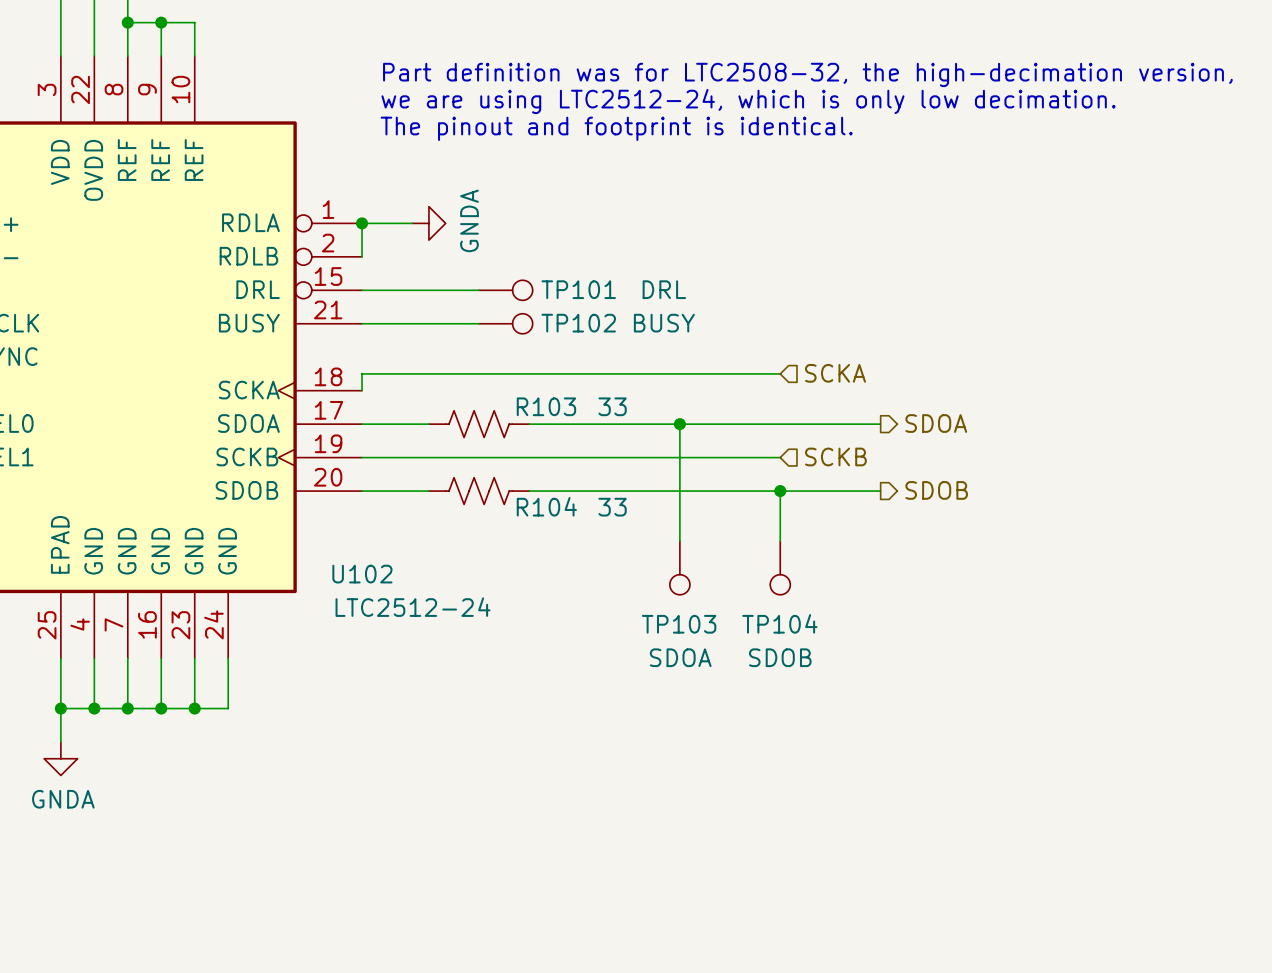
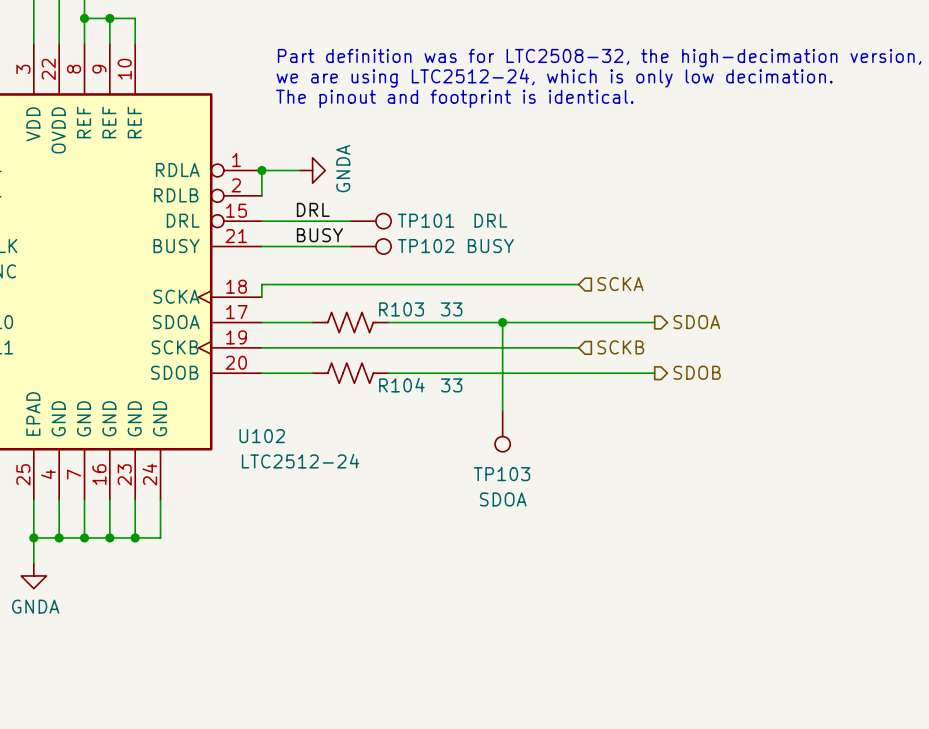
label: none -> DRL (313, 209)
label: none -> BUSY (319, 235)
wire: (780, 491) (780, 541) -> none
junction: (780, 491) -> none
TP104: SDOB (780, 568) -> none

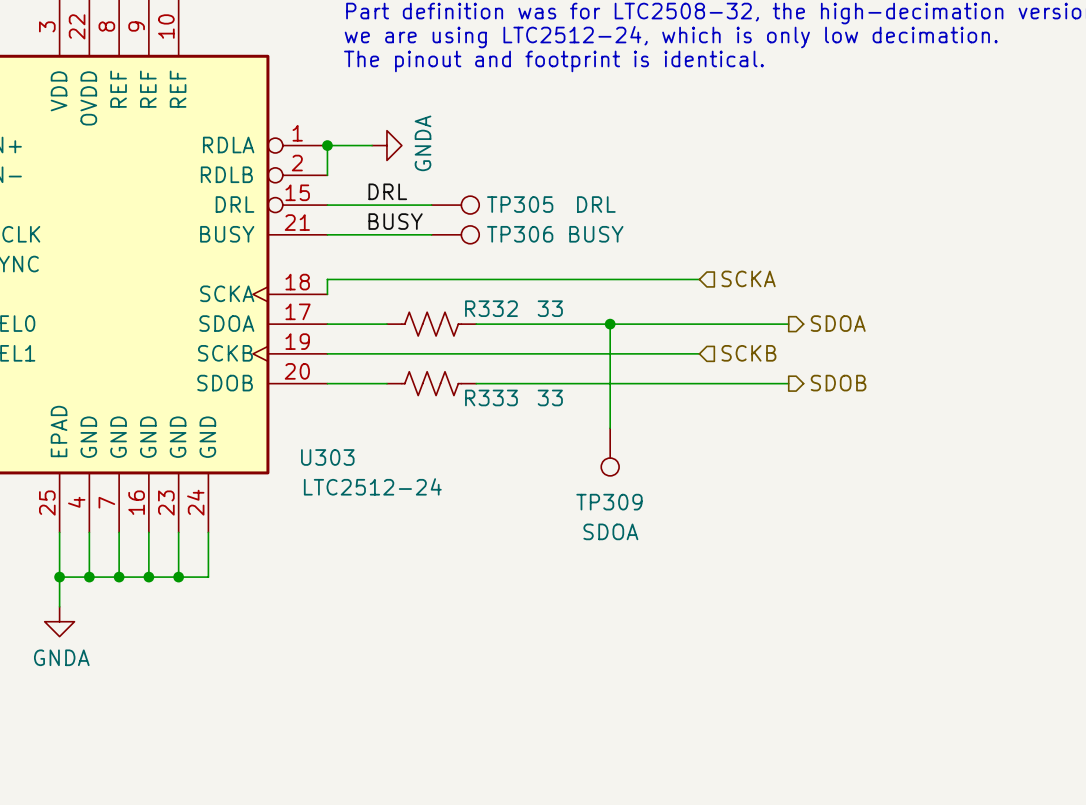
TP101 name: TP101 (426, 220) -> TP305 (520, 204)
TP102 name: TP102 (426, 246) -> TP306 (520, 234)
R103 name: R103 (401, 309) -> R332 (491, 308)
R104 name: R104 (401, 385) -> R333 (491, 397)
U102 name: U102 (262, 436) -> U303 (327, 457)
TP103 name: TP103 (502, 474) -> TP309 (609, 502)

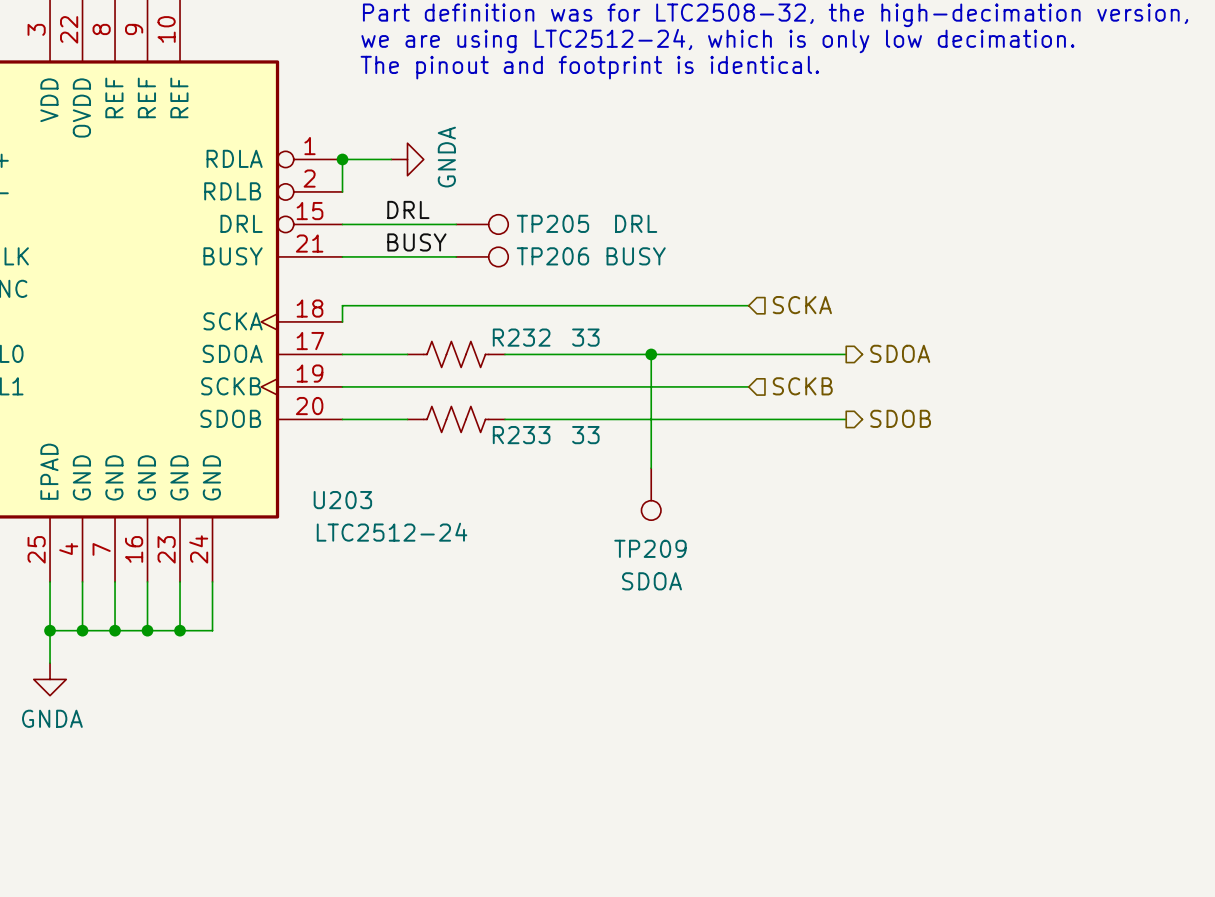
TP305 name: TP305 (520, 204) -> TP205 (552, 223)
TP306 name: TP306 (520, 234) -> TP206 (552, 256)
R332 name: R332 (491, 308) -> R232 (521, 337)
R333 name: R333 (491, 397) -> R233 (521, 435)
U303 name: U303 (327, 457) -> U203 (342, 500)
TP309 name: TP309 (609, 502) -> TP209 (650, 548)

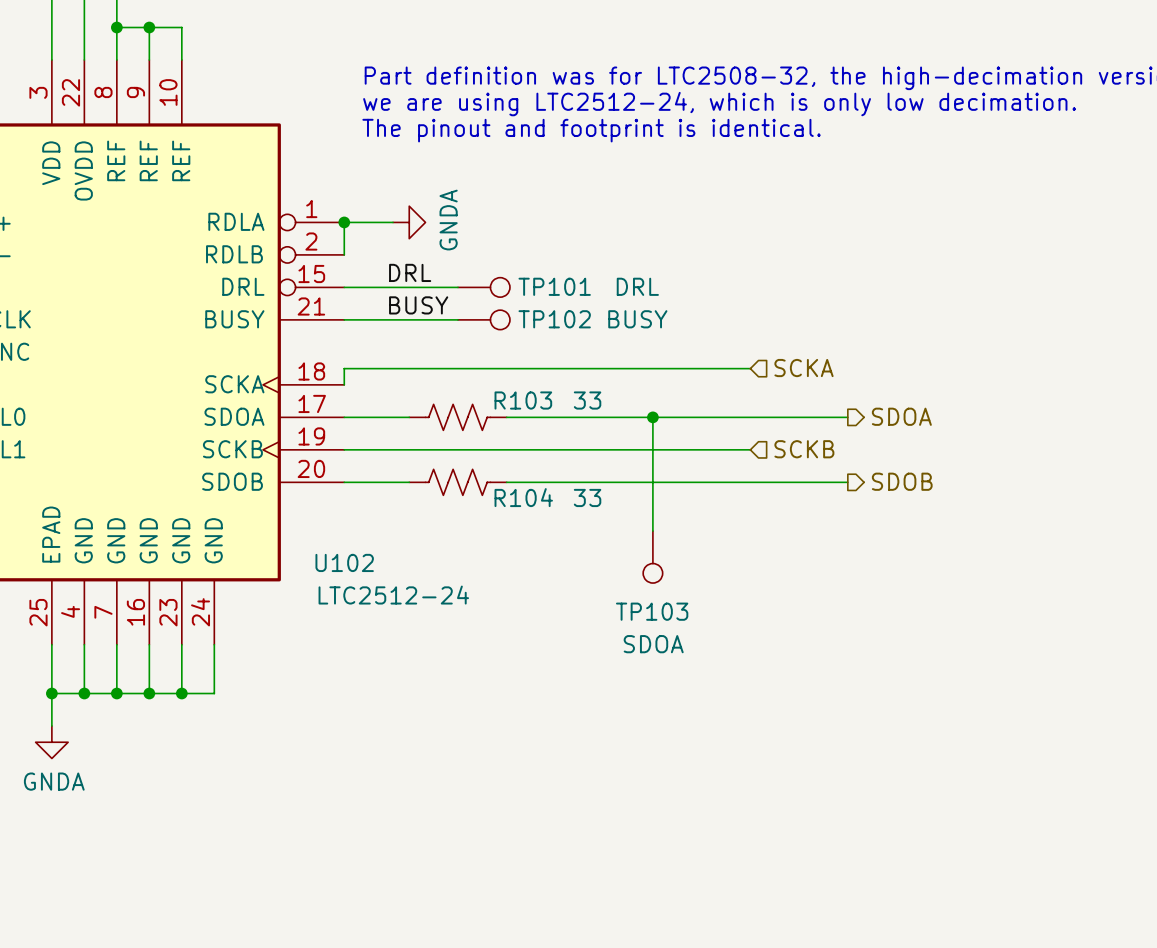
TP205 name: TP205 (552, 223) -> TP101 (554, 286)
TP206 name: TP206 (552, 256) -> TP102 (554, 319)
R232 name: R232 (521, 337) -> R103 (523, 400)
R233 name: R233 (521, 435) -> R104 (523, 497)
U203 name: U203 (342, 500) -> U102 (344, 562)
TP209 name: TP209 (650, 548) -> TP103 (652, 611)

